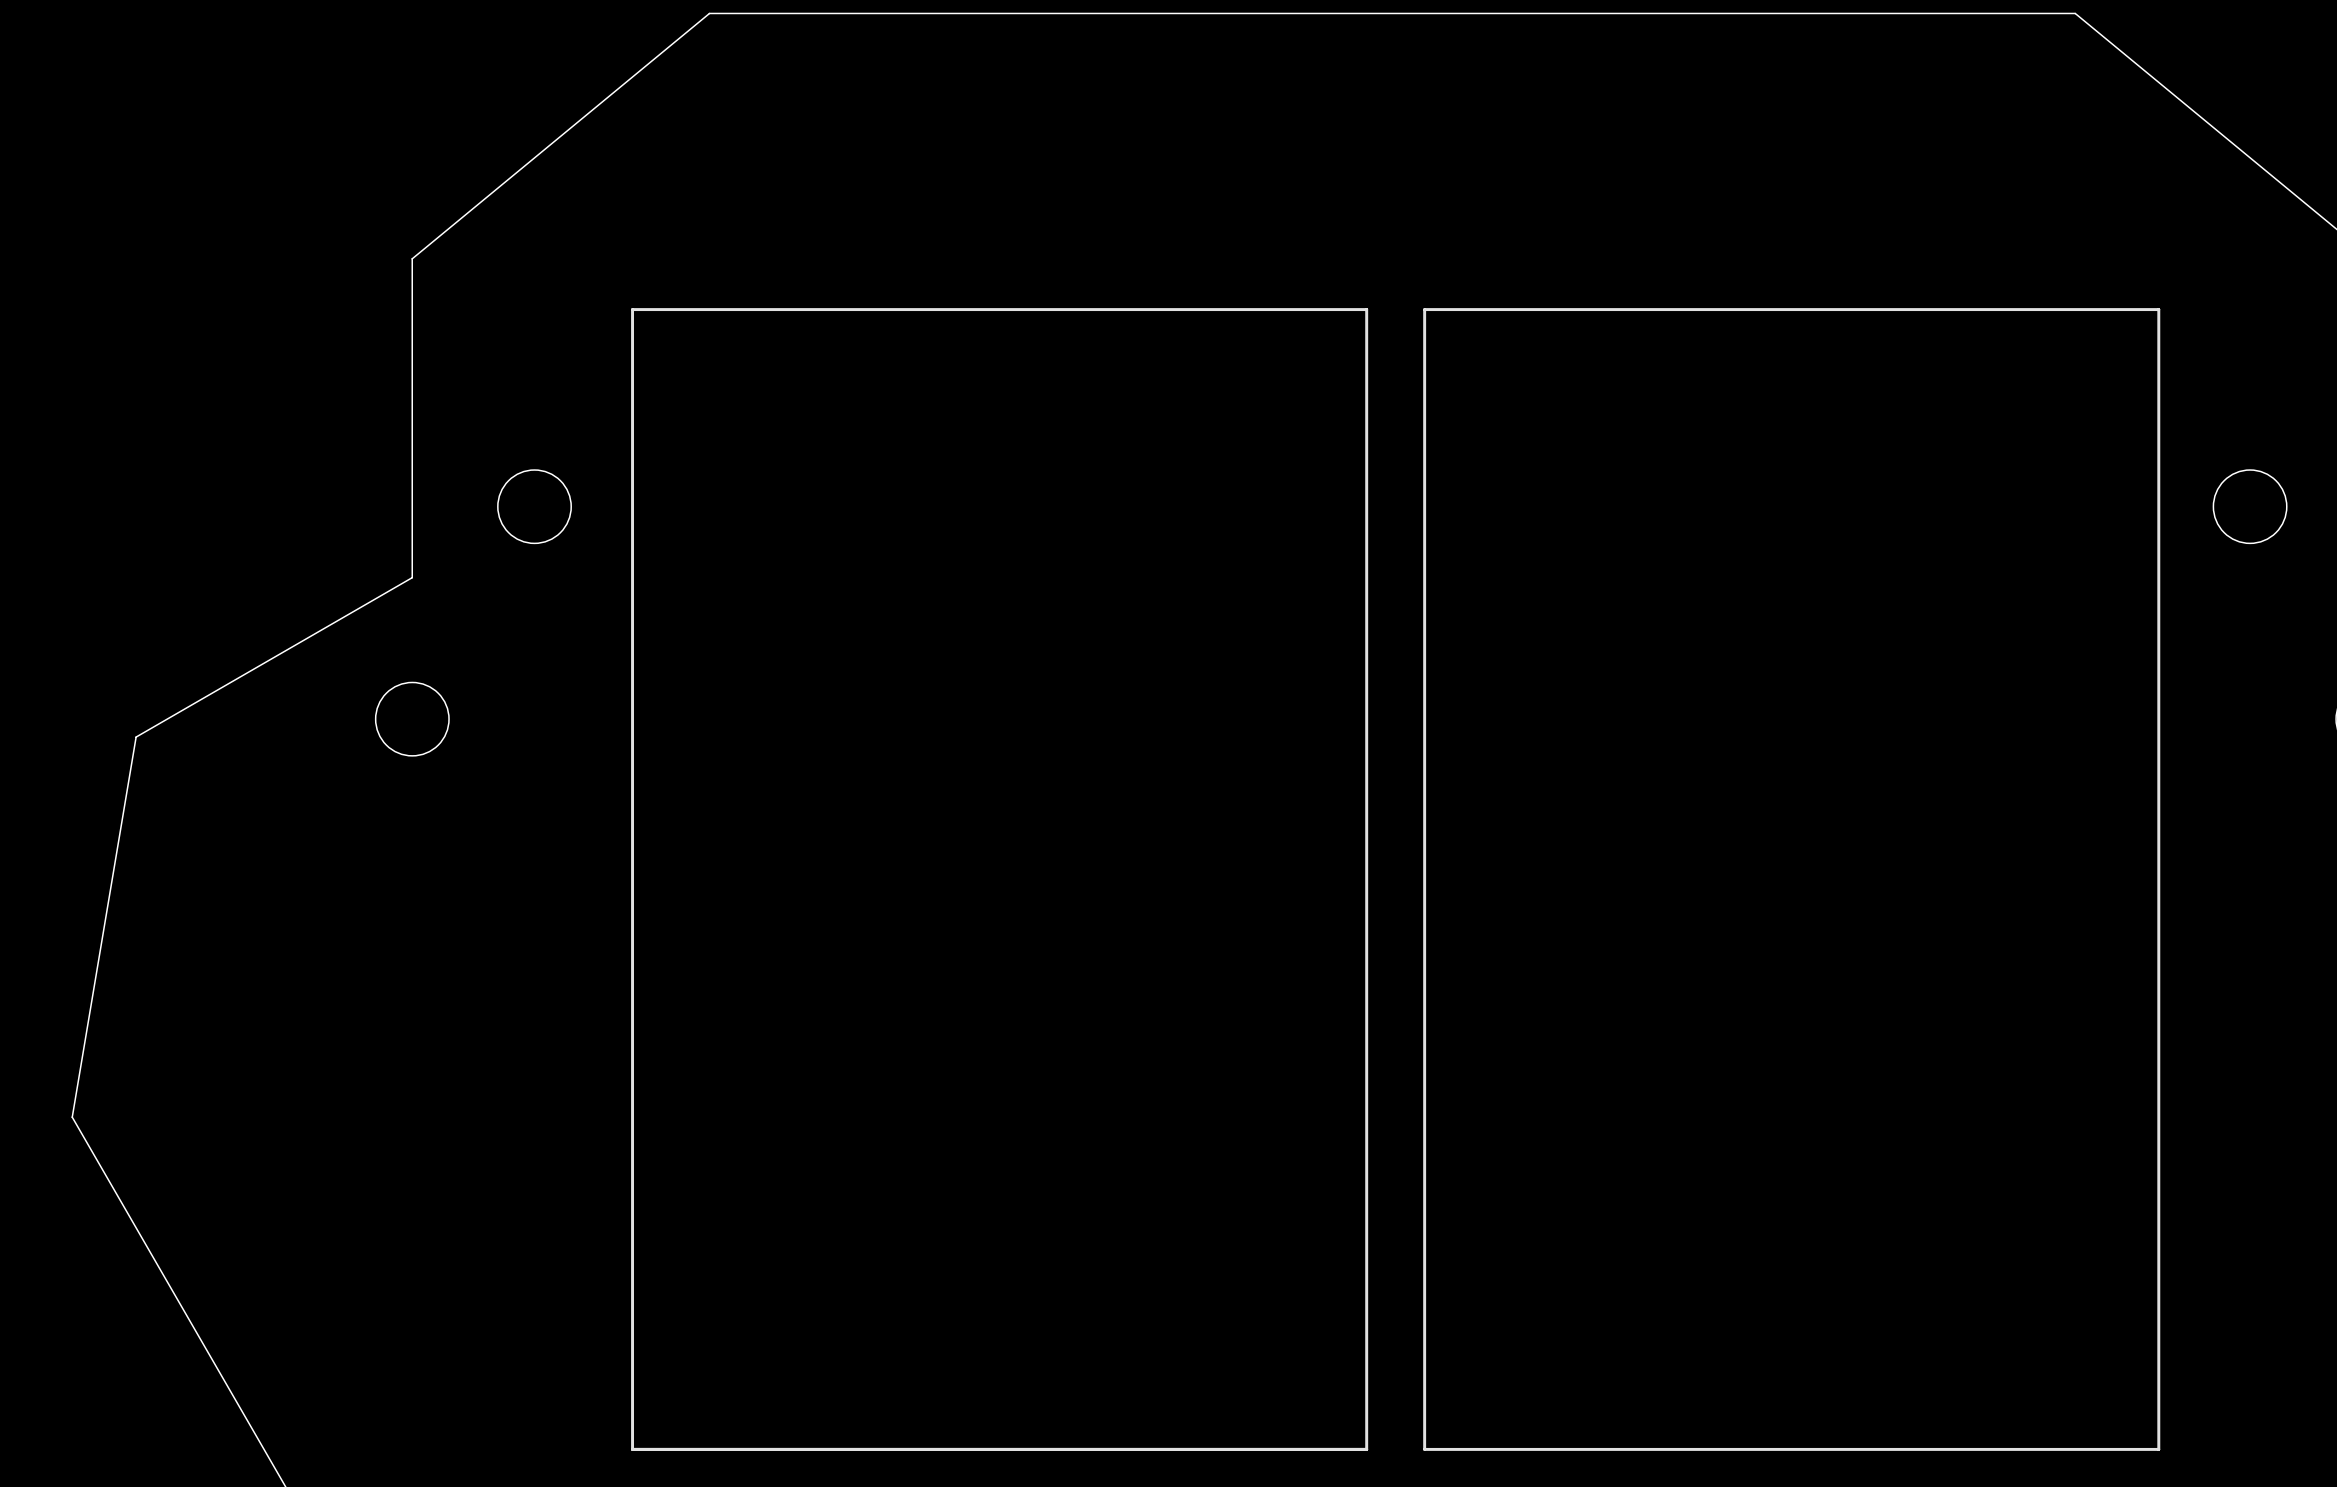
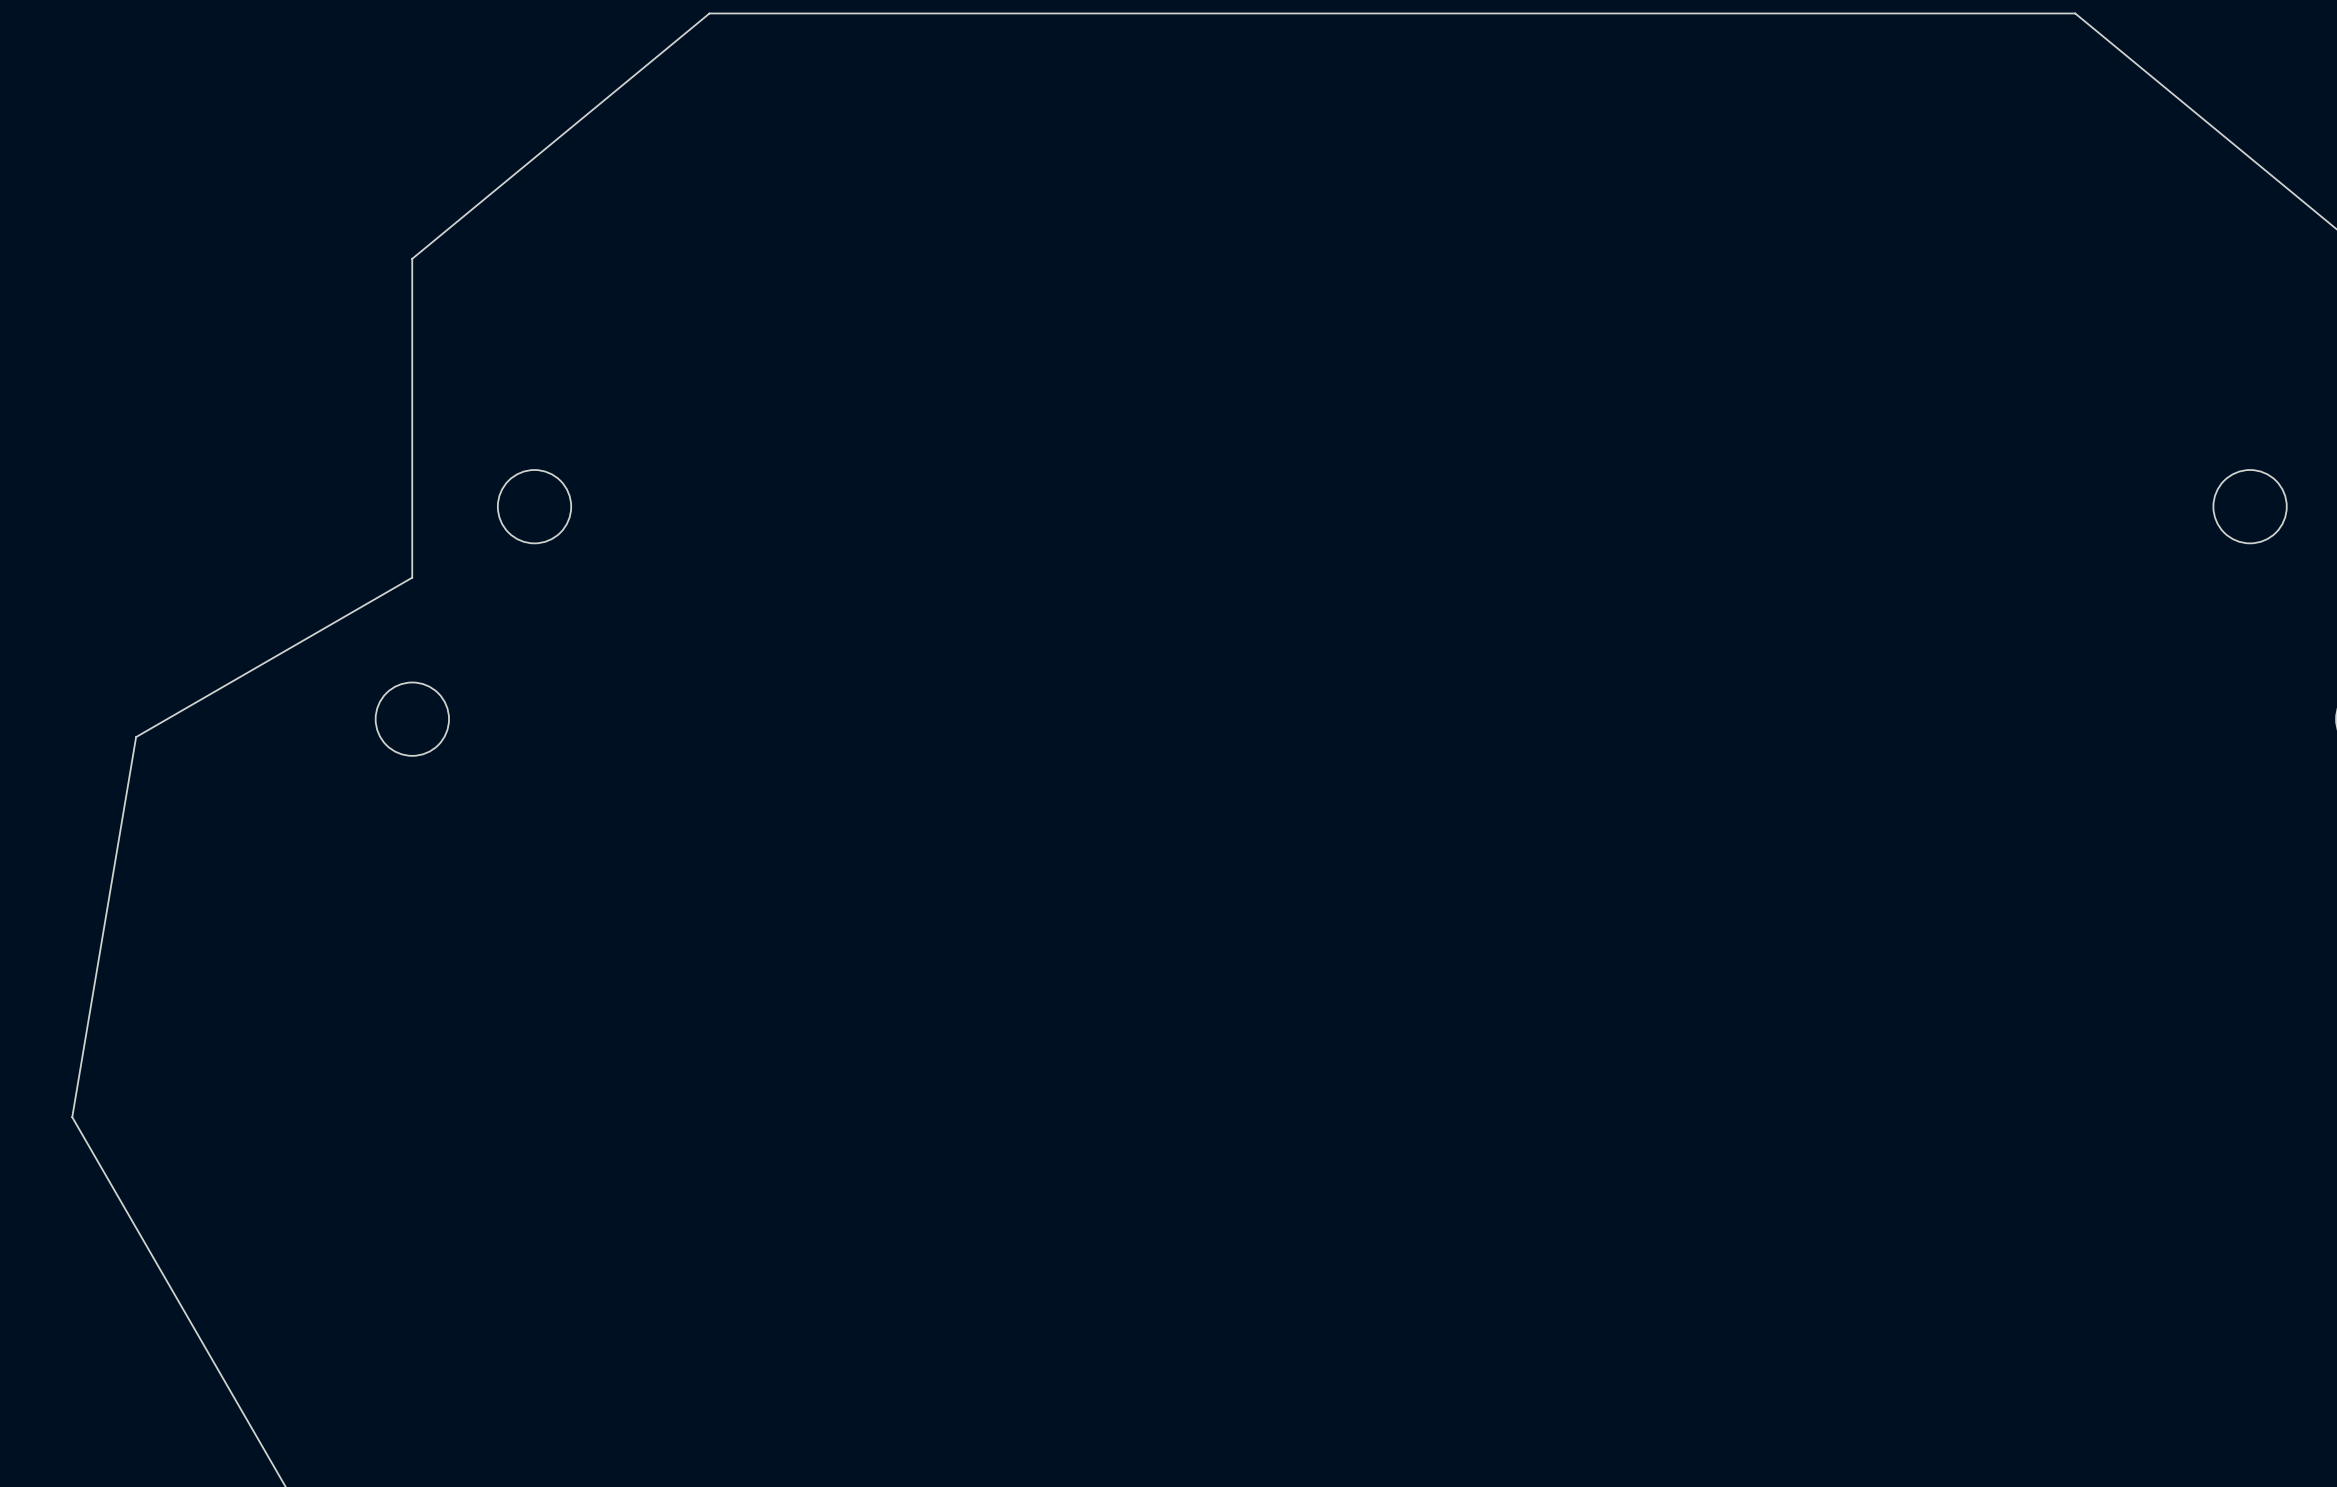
line: (632, 309) (632, 1449) (1366, 1449) (1366, 309) (632, 309) -> none
line: (1424, 309) (2158, 309) (2158, 1449) (1424, 1449) (1424, 309) -> none

